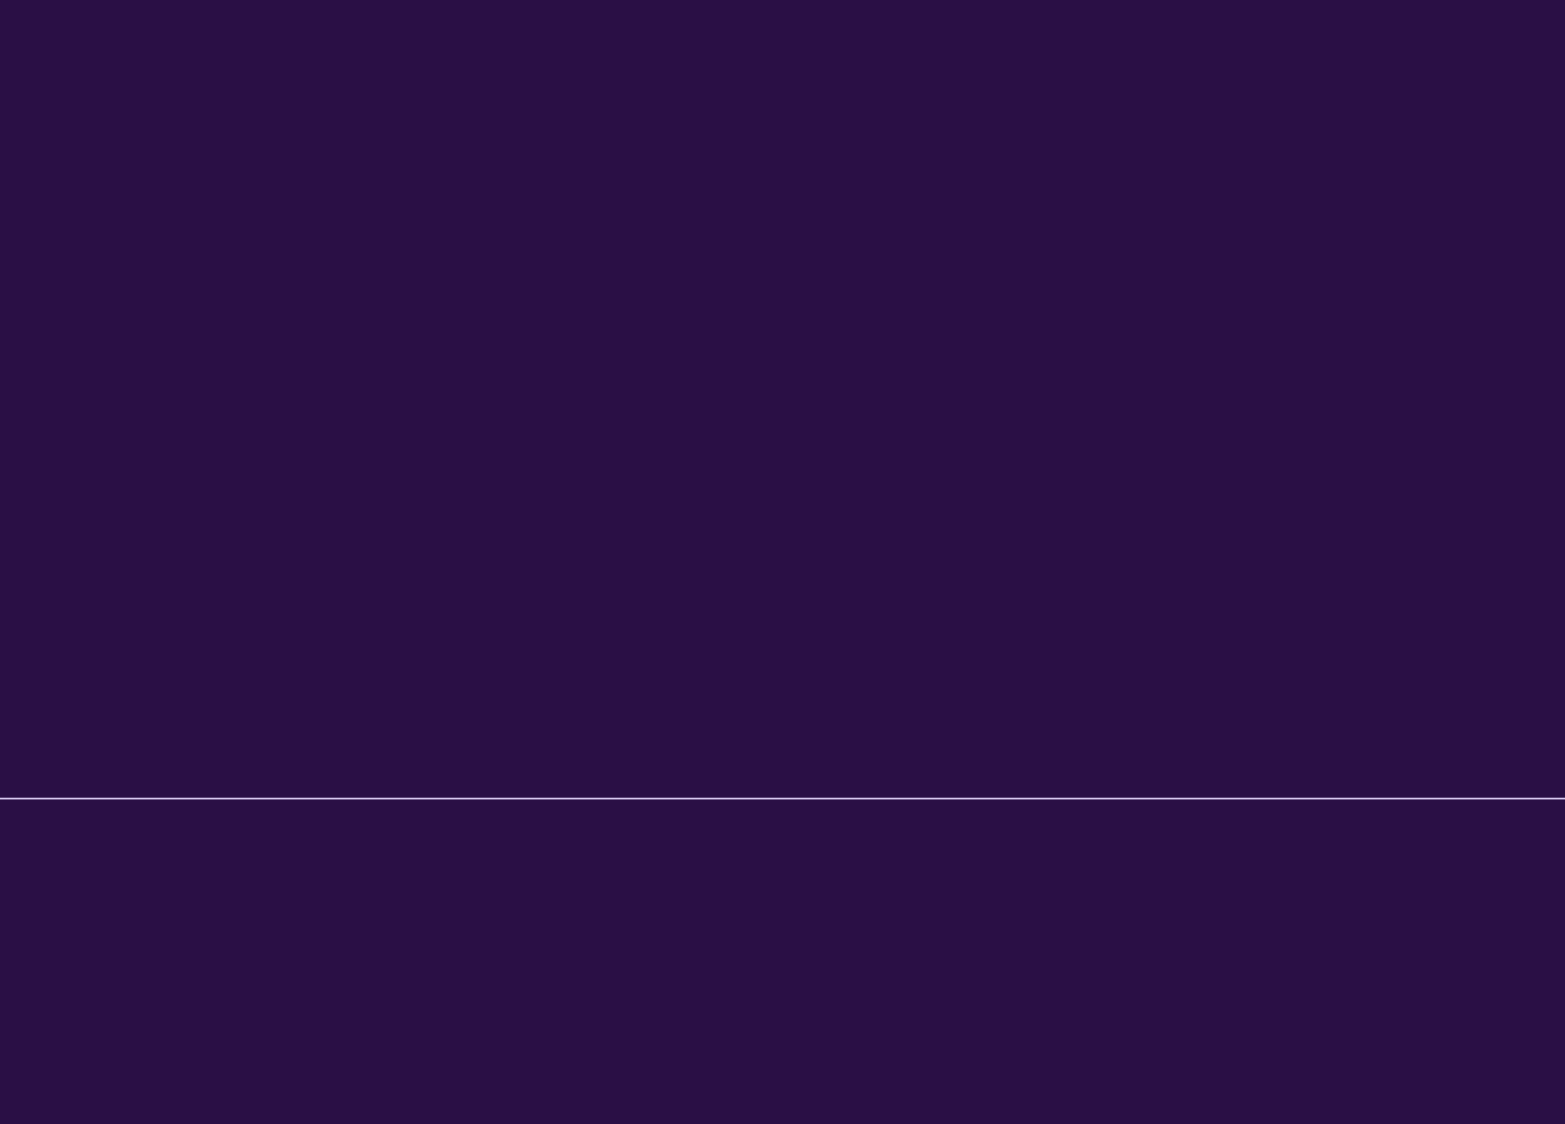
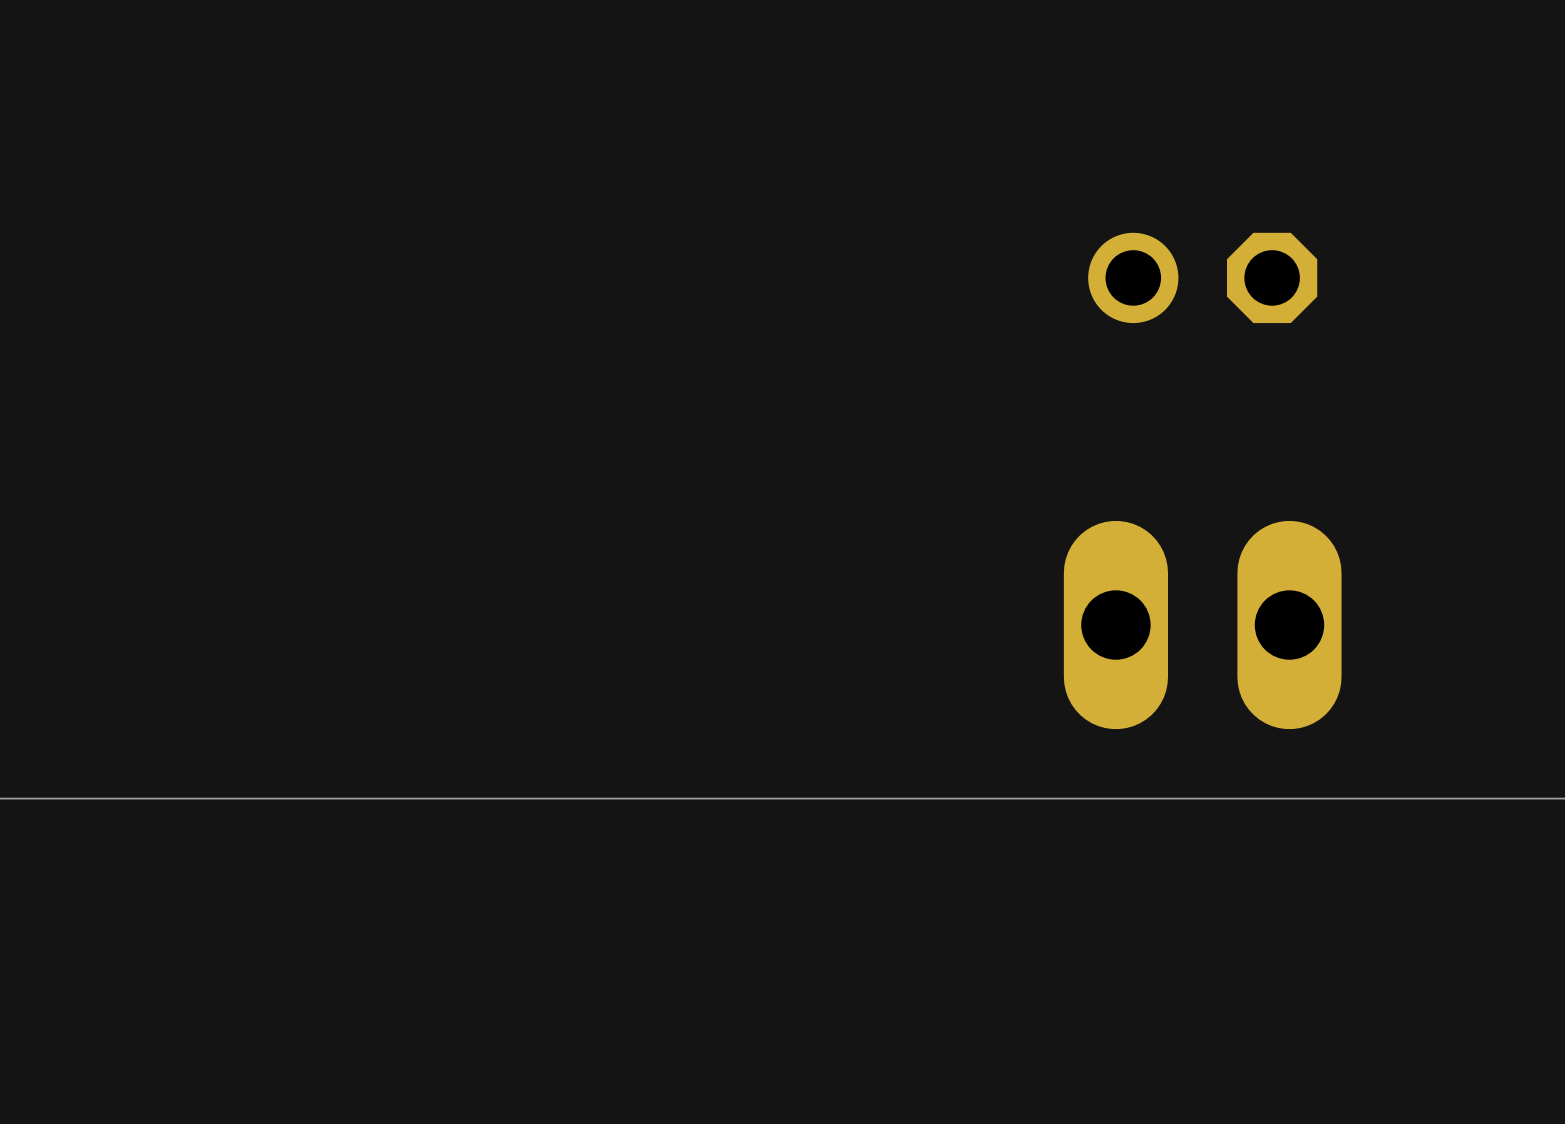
part: none -> (1202, 277)
part: none -> (1202, 625)

